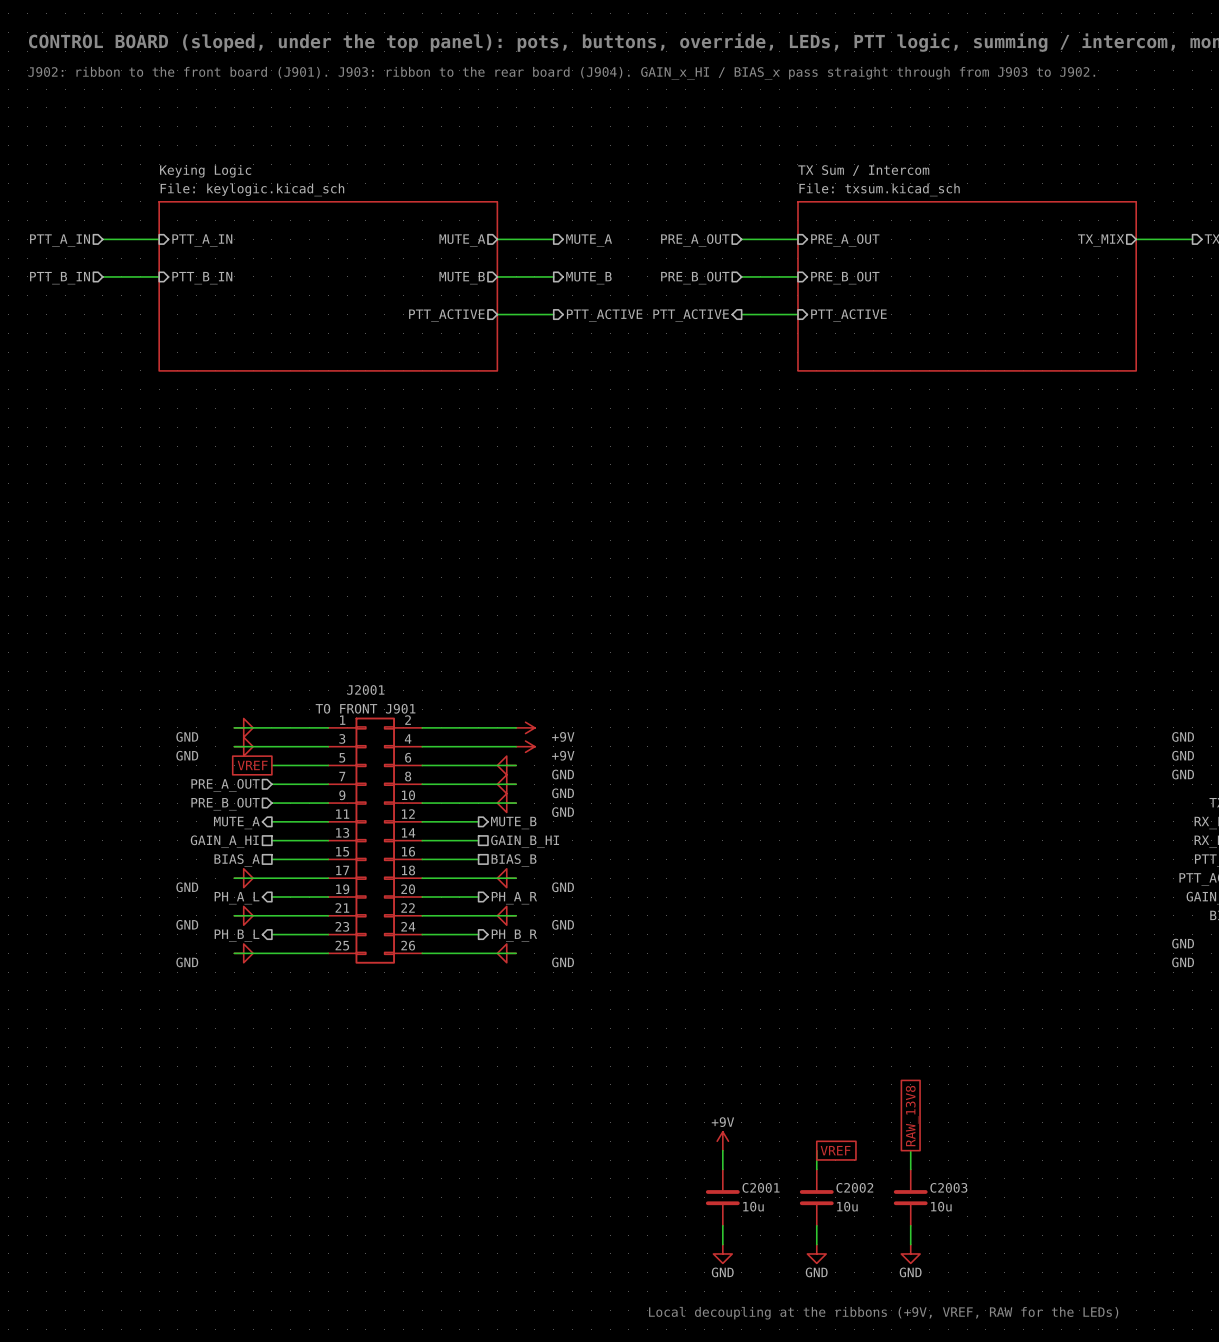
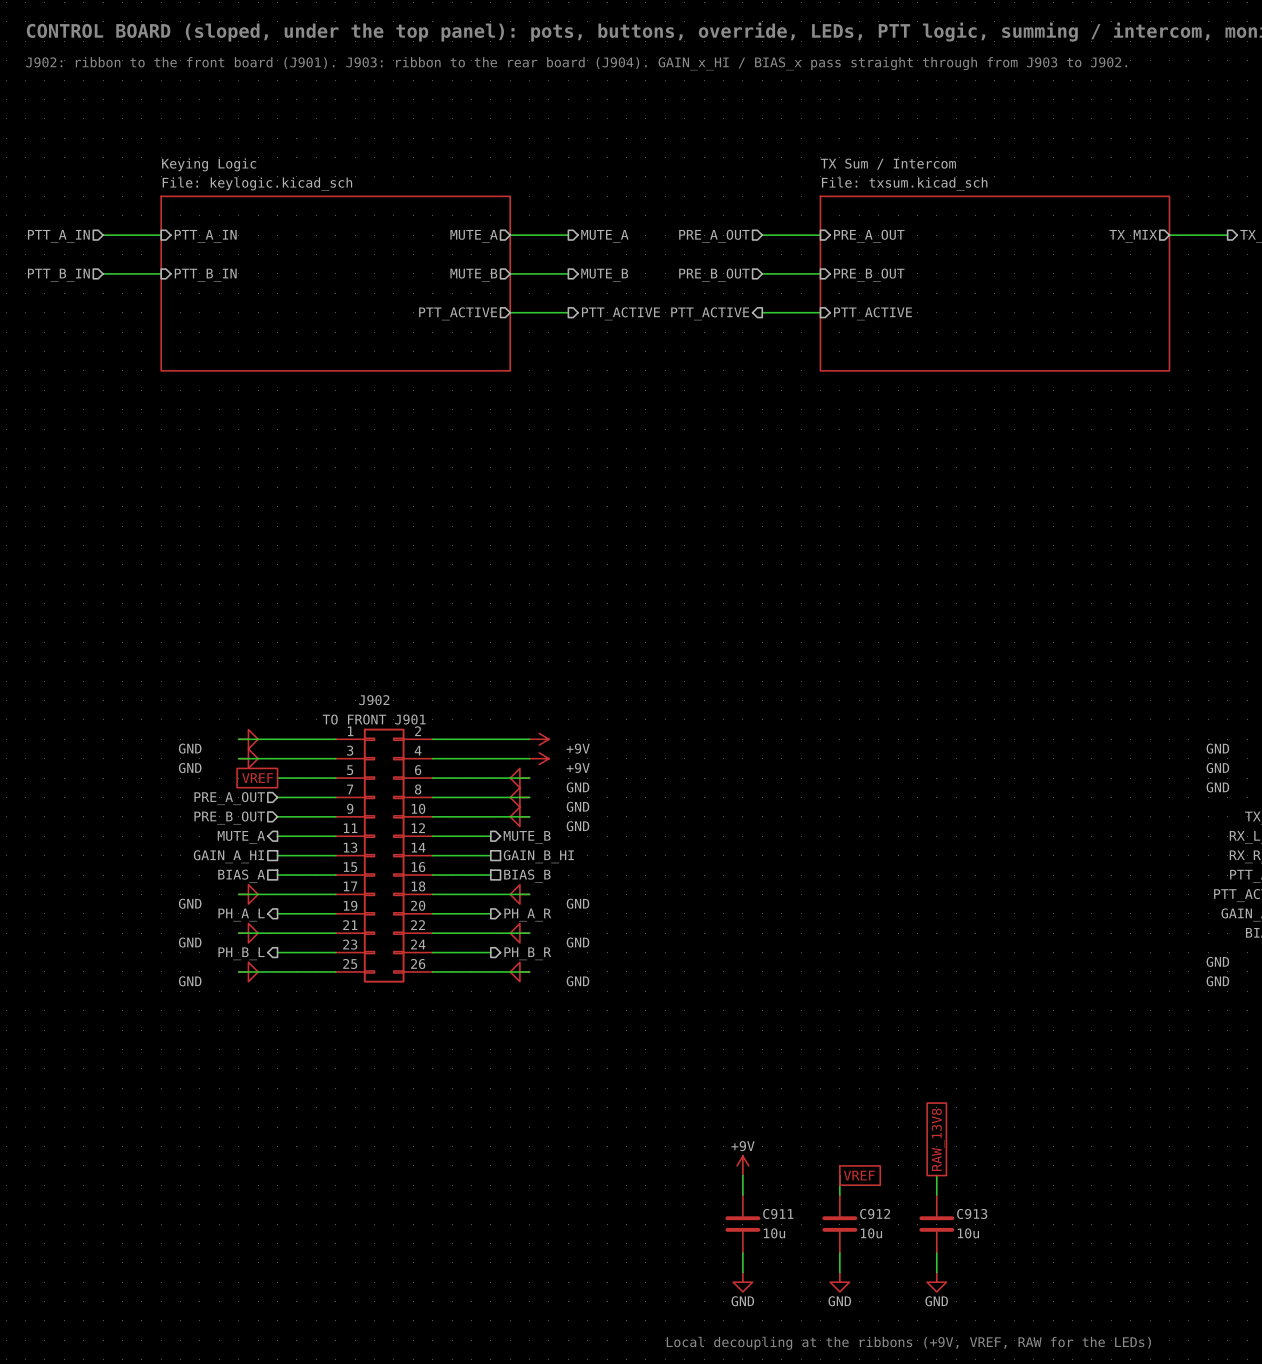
J2001 name: J2001 (365, 689) -> J902 (374, 700)
C2001 name: C2001 (761, 1187) -> C911 (778, 1213)
C2002 name: C2002 (854, 1187) -> C912 (875, 1213)
C2003 name: C2003 (948, 1187) -> C913 (972, 1213)

